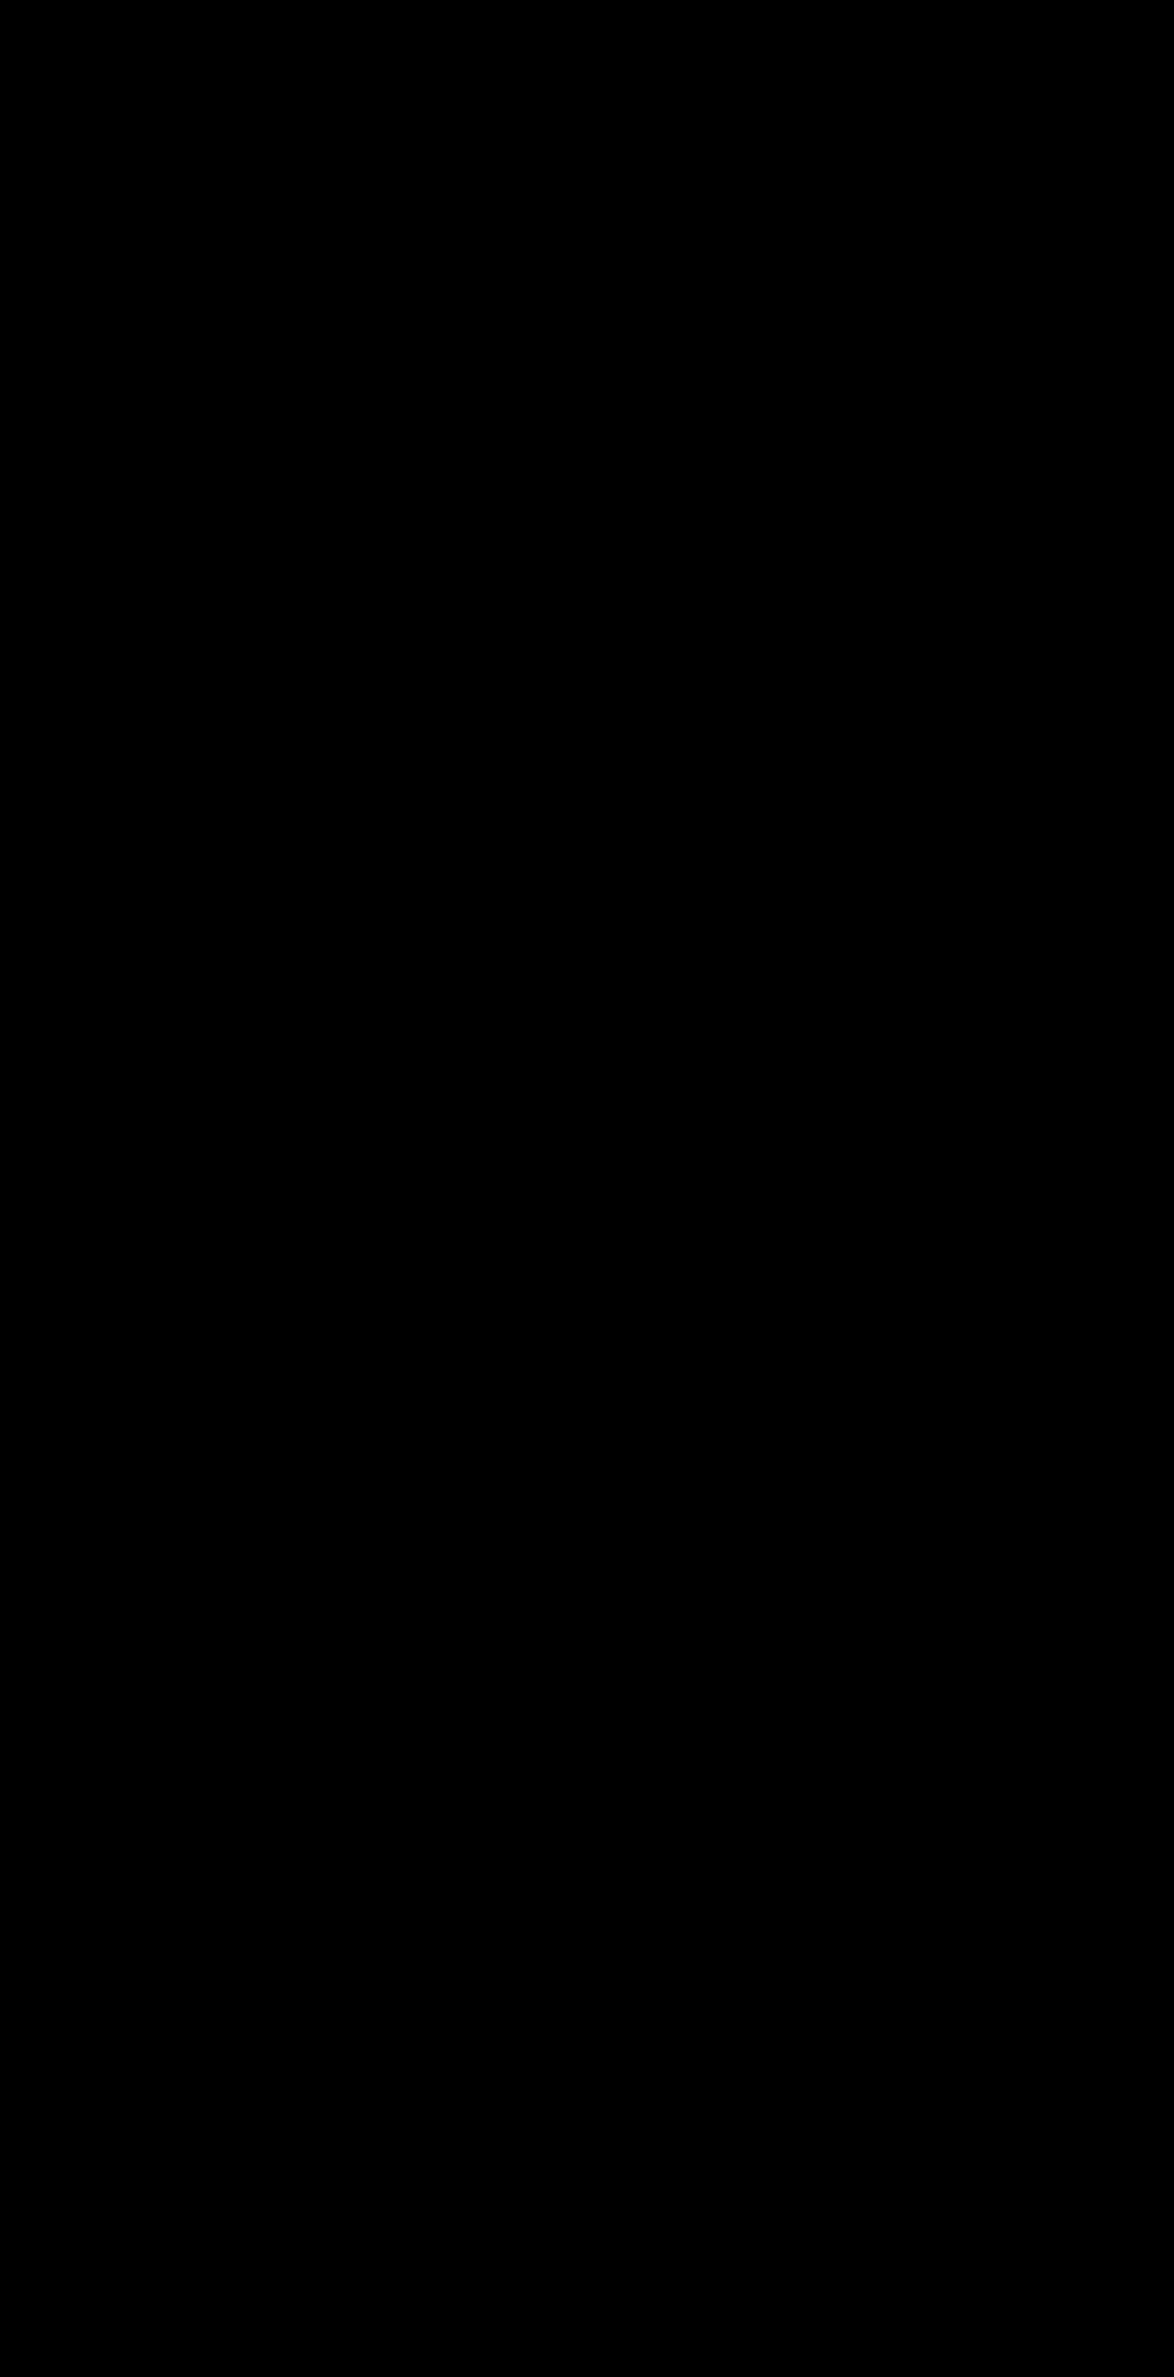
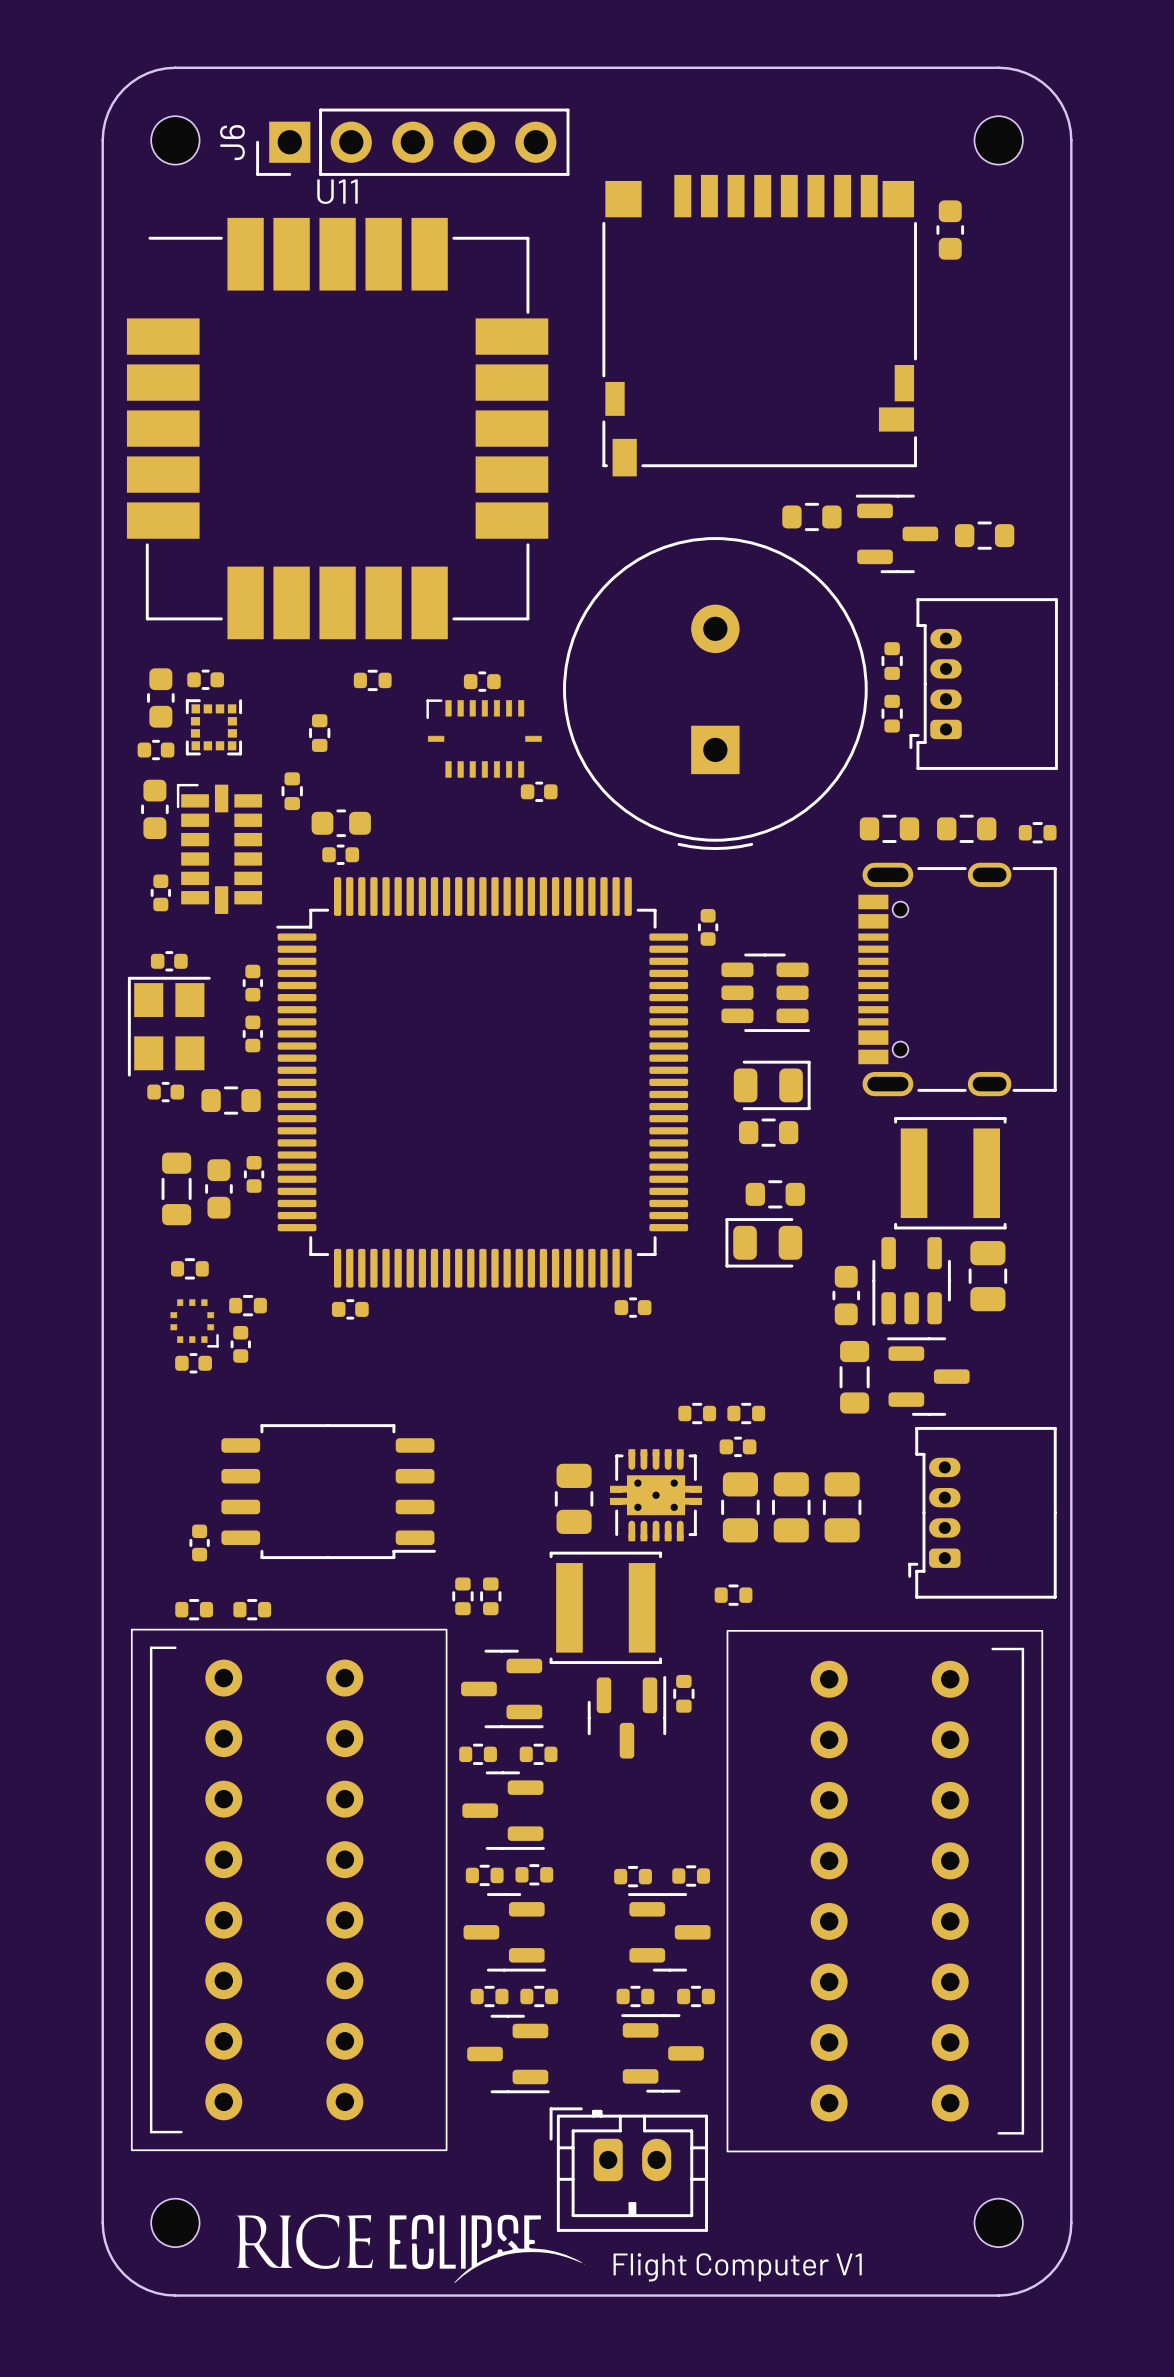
board edge: none -> (175, 67) (998, 67) (1017, 70) (1035, 77) (1050, 89) (1065, 112) (1071, 140) (1071, 2222) (1068, 2241) (1056, 2267) (1042, 2280) (1026, 2290) (998, 2295) (175, 2295) (147, 2290) (131, 2280) (117, 2267) (108, 2250) (102, 2222) (102, 140) (108, 112) (124, 89) (147, 73) (175, 67)
part: none -> (175, 140)
part: none -> (998, 140)
J6: none -> (412, 142)
part: none -> (950, 230)
part: none -> (759, 325)
U11: none -> (337, 428)
part: none -> (811, 516)
part: none -> (896, 533)
part: none -> (984, 535)
part: none -> (892, 661)
part: none -> (205, 679)
part: none -> (372, 680)
part: none -> (482, 681)
part: none -> (983, 684)
part: none -> (715, 693)
part: none -> (160, 697)
part: none -> (892, 713)
part: none -> (213, 727)
part: none -> (319, 733)
part: none -> (484, 738)
part: none -> (156, 750)
part: none -> (292, 791)
part: none -> (539, 791)
part: none -> (154, 809)
part: none -> (341, 823)
part: none -> (889, 828)
part: none -> (966, 828)
part: none -> (1037, 832)
part: none -> (219, 848)
part: none -> (340, 854)
part: none -> (160, 892)
part: none -> (708, 927)
part: none -> (169, 961)
part: none -> (957, 979)
part: none -> (252, 983)
part: none -> (765, 992)
part: none -> (169, 1026)
part: none -> (252, 1033)
part: none -> (482, 1082)
part: none -> (772, 1085)
part: none -> (165, 1092)
part: none -> (231, 1100)
part: none -> (768, 1132)
part: none -> (950, 1173)
part: none -> (254, 1174)
part: none -> (176, 1188)
part: none -> (218, 1188)
part: none -> (775, 1194)
part: none -> (763, 1242)
part: none -> (189, 1268)
part: none -> (987, 1276)
part: none -> (911, 1281)
part: none -> (846, 1295)
part: none -> (248, 1305)
part: none -> (633, 1307)
part: none -> (350, 1309)
part: none -> (194, 1323)
part: none -> (240, 1344)
part: none -> (193, 1363)
part: none -> (928, 1376)
part: none -> (854, 1377)
part: none -> (697, 1413)
part: none -> (746, 1413)
part: none -> (738, 1446)
part: none -> (328, 1491)
part: none -> (656, 1495)
part: none -> (574, 1498)
part: none -> (740, 1507)
part: none -> (791, 1507)
part: none -> (842, 1507)
part: none -> (982, 1512)
part: none -> (199, 1542)
part: none -> (733, 1595)
part: none -> (462, 1596)
part: none -> (490, 1596)
part: none -> (605, 1607)
part: none -> (194, 1609)
part: none -> (252, 1609)
part: none -> (502, 1688)
part: none -> (683, 1693)
part: none -> (626, 1717)
part: none -> (478, 1754)
part: none -> (538, 1754)
part: none -> (503, 1810)
part: none -> (534, 1874)
part: none -> (484, 1875)
part: none -> (633, 1876)
part: none -> (691, 1876)
part: none -> (289, 1889)
part: none -> (884, 1891)
part: none -> (504, 1932)
part: none -> (669, 1932)
part: none -> (489, 1996)
part: none -> (539, 1996)
part: none -> (635, 1996)
part: none -> (695, 1996)
part: none -> (662, 2053)
part: none -> (508, 2054)
part: none -> (628, 2169)
drawing: none -> [236, 2214, 585, 2284]
part: none -> (175, 2222)
part: none -> (998, 2222)
text: none -> Flight Computer V1 (737, 2267)

